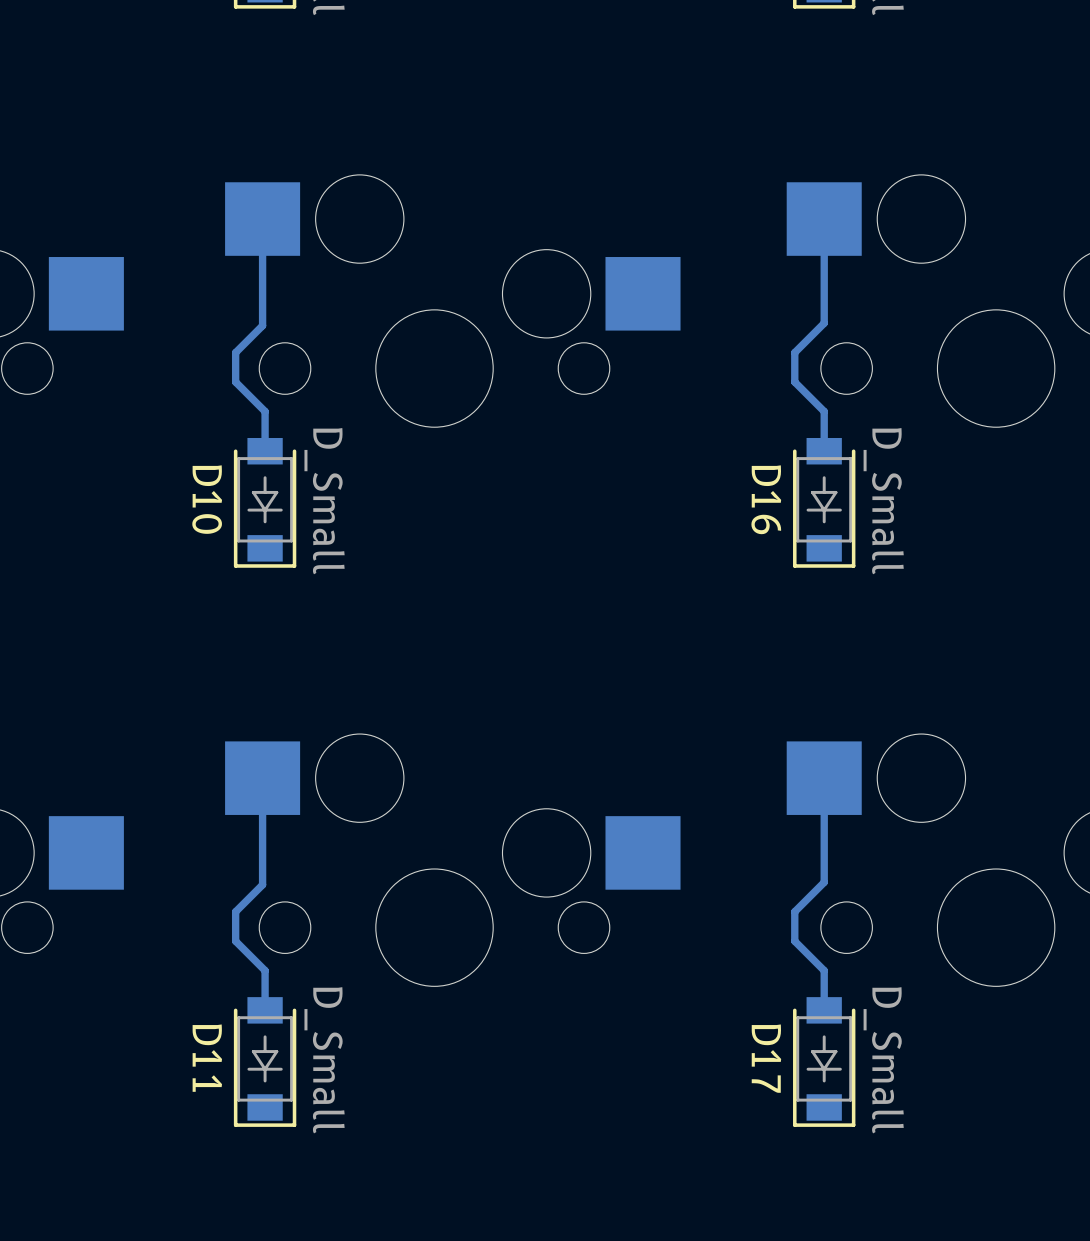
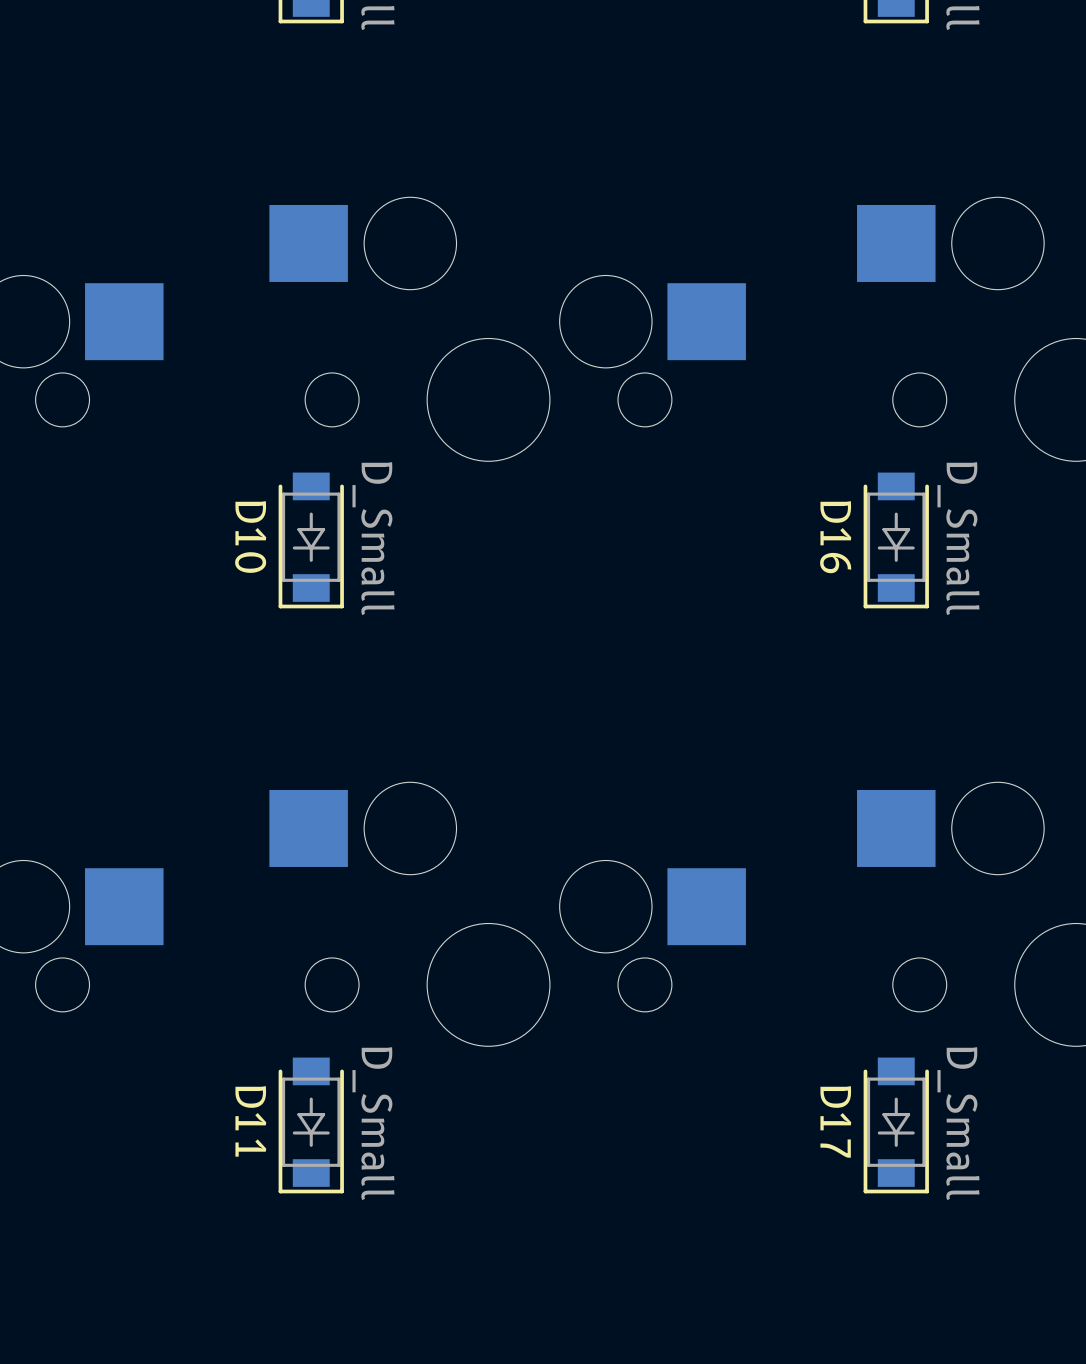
bottom track: (262, 219) (262, 325) (235, 352) (235, 382) (265, 411) (265, 451) -> none
bottom track: (824, 219) (824, 323) (794, 352) (794, 382) (824, 411) (824, 451) -> none
bottom track: (262, 778) (262, 884) (235, 911) (235, 941) (265, 970) (265, 1010) -> none
bottom track: (824, 778) (824, 882) (794, 911) (794, 941) (824, 970) (824, 1010) -> none

